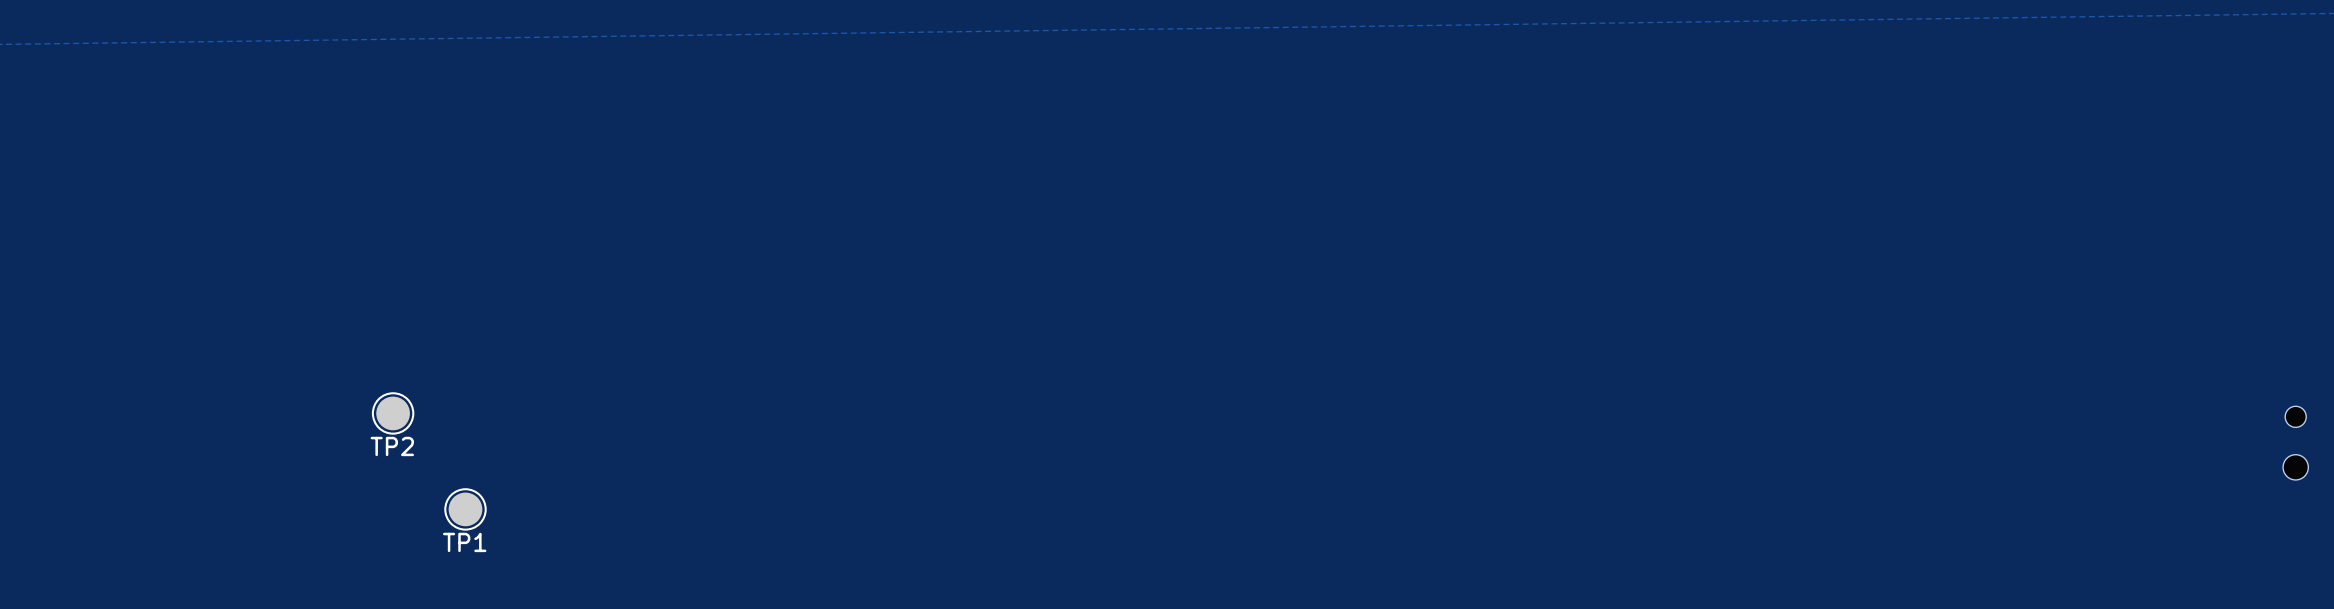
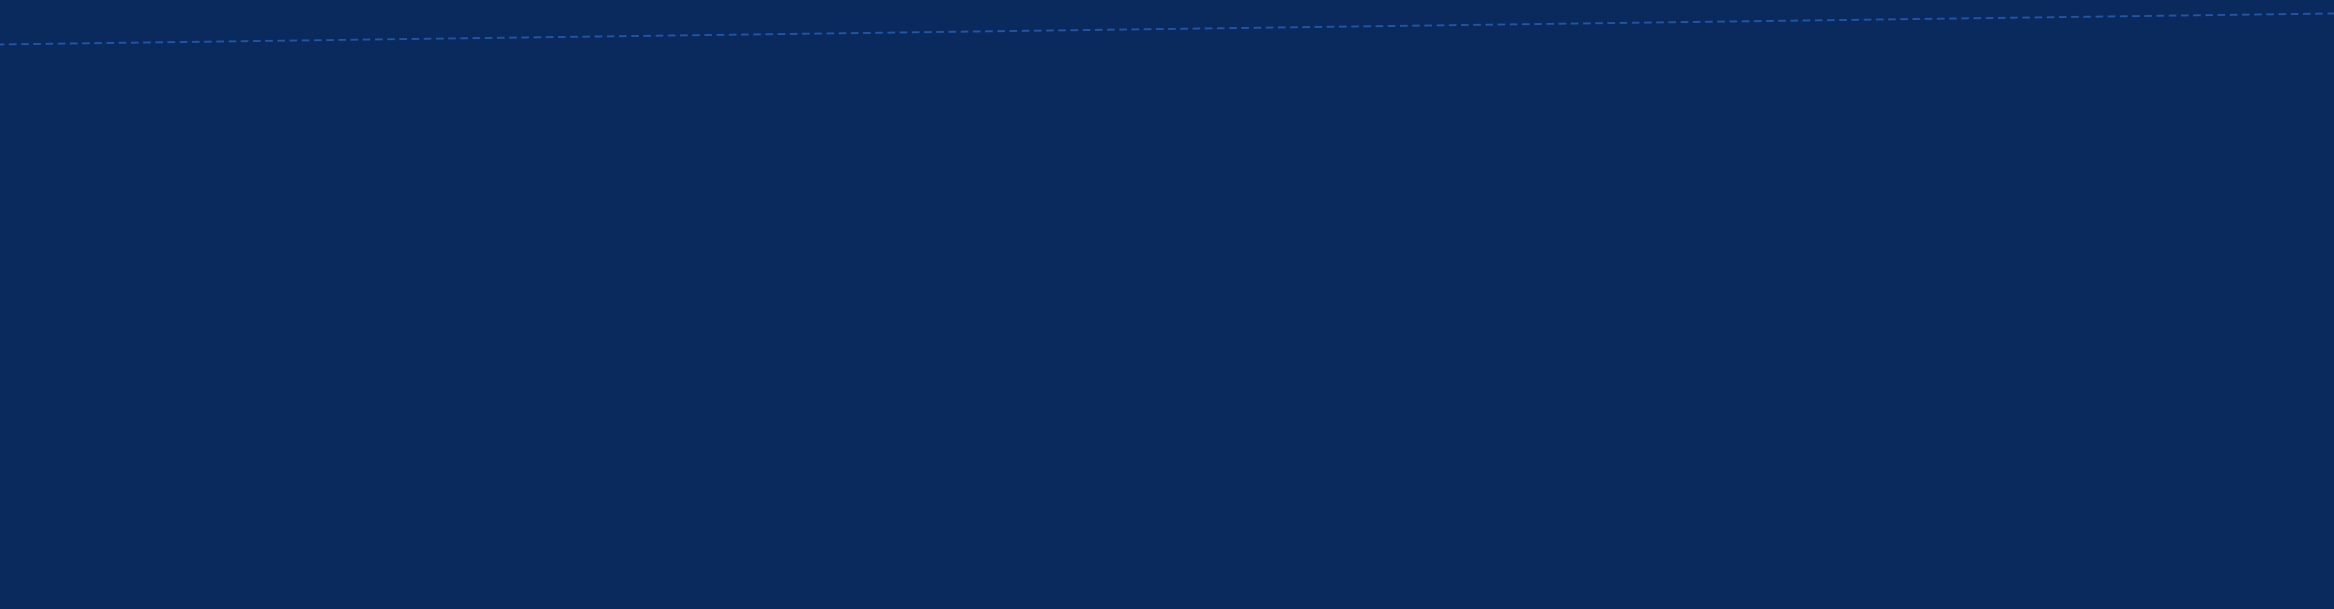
TP2: (393, 413) -> none
part: (2295, 443) -> none
TP1: (465, 509) -> none

